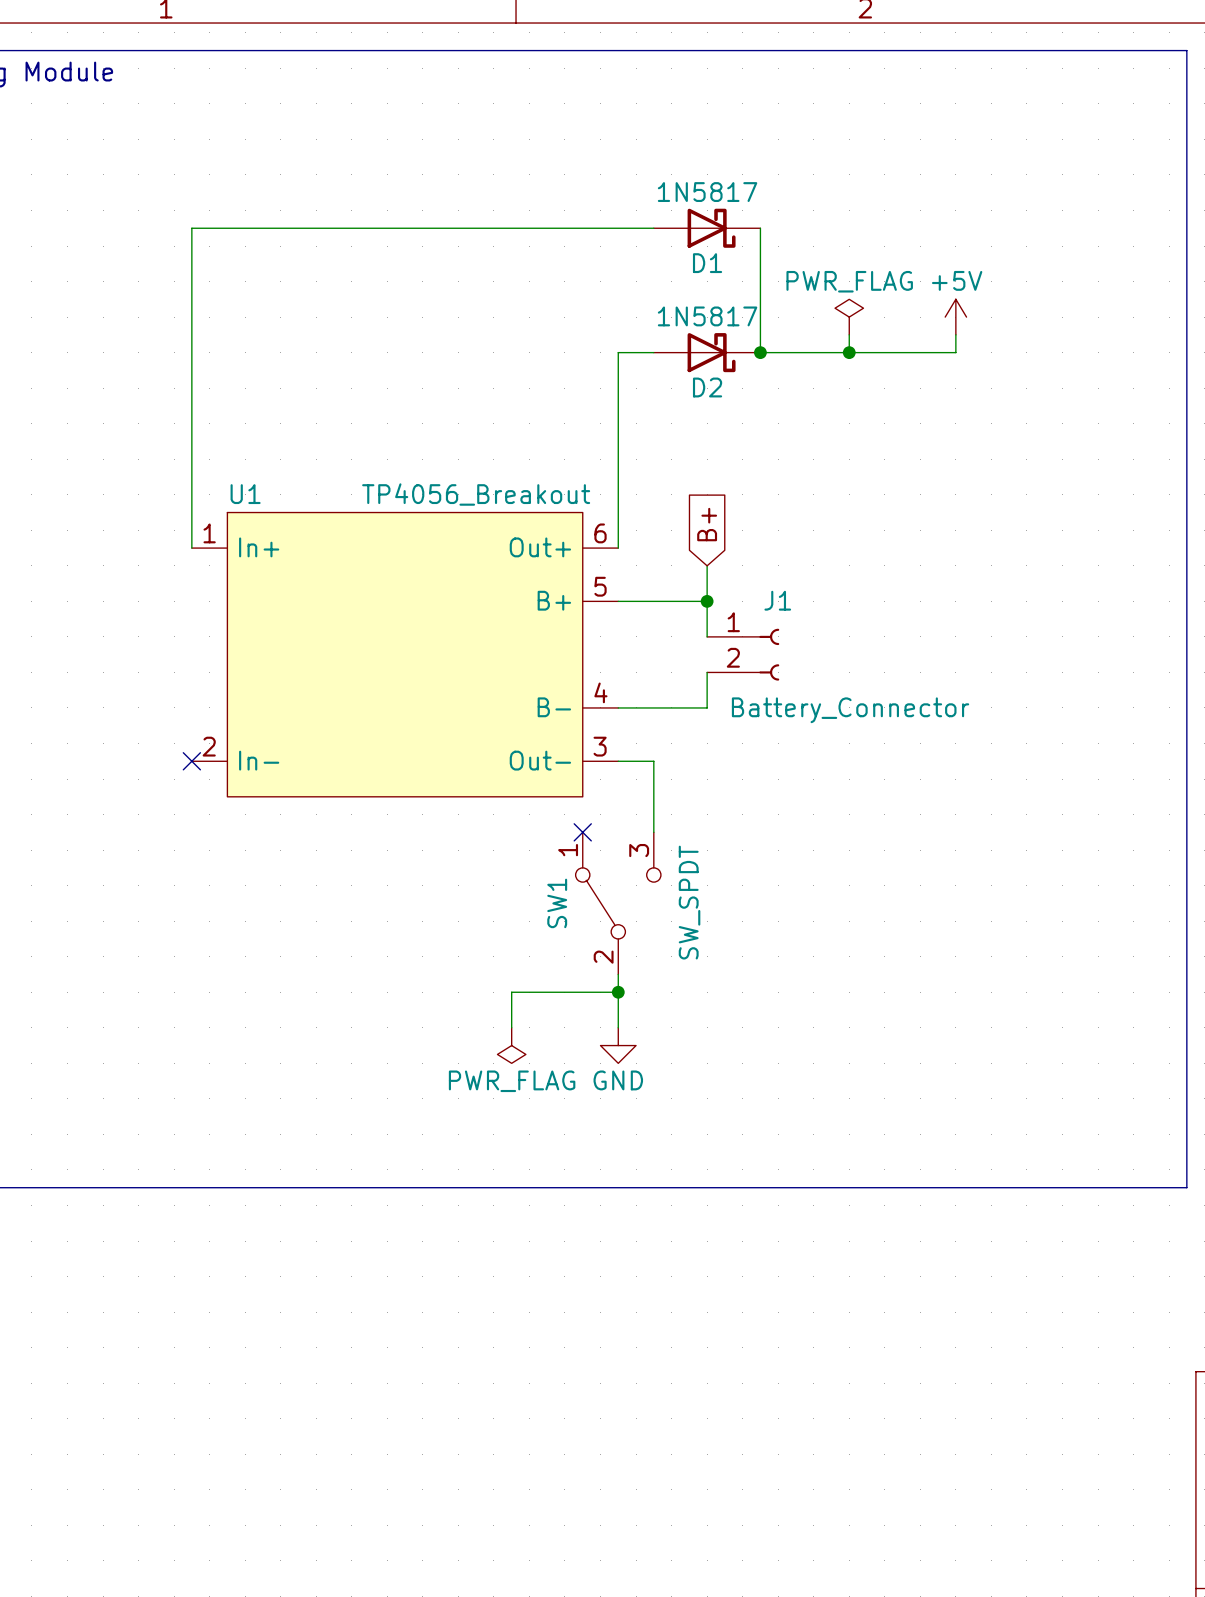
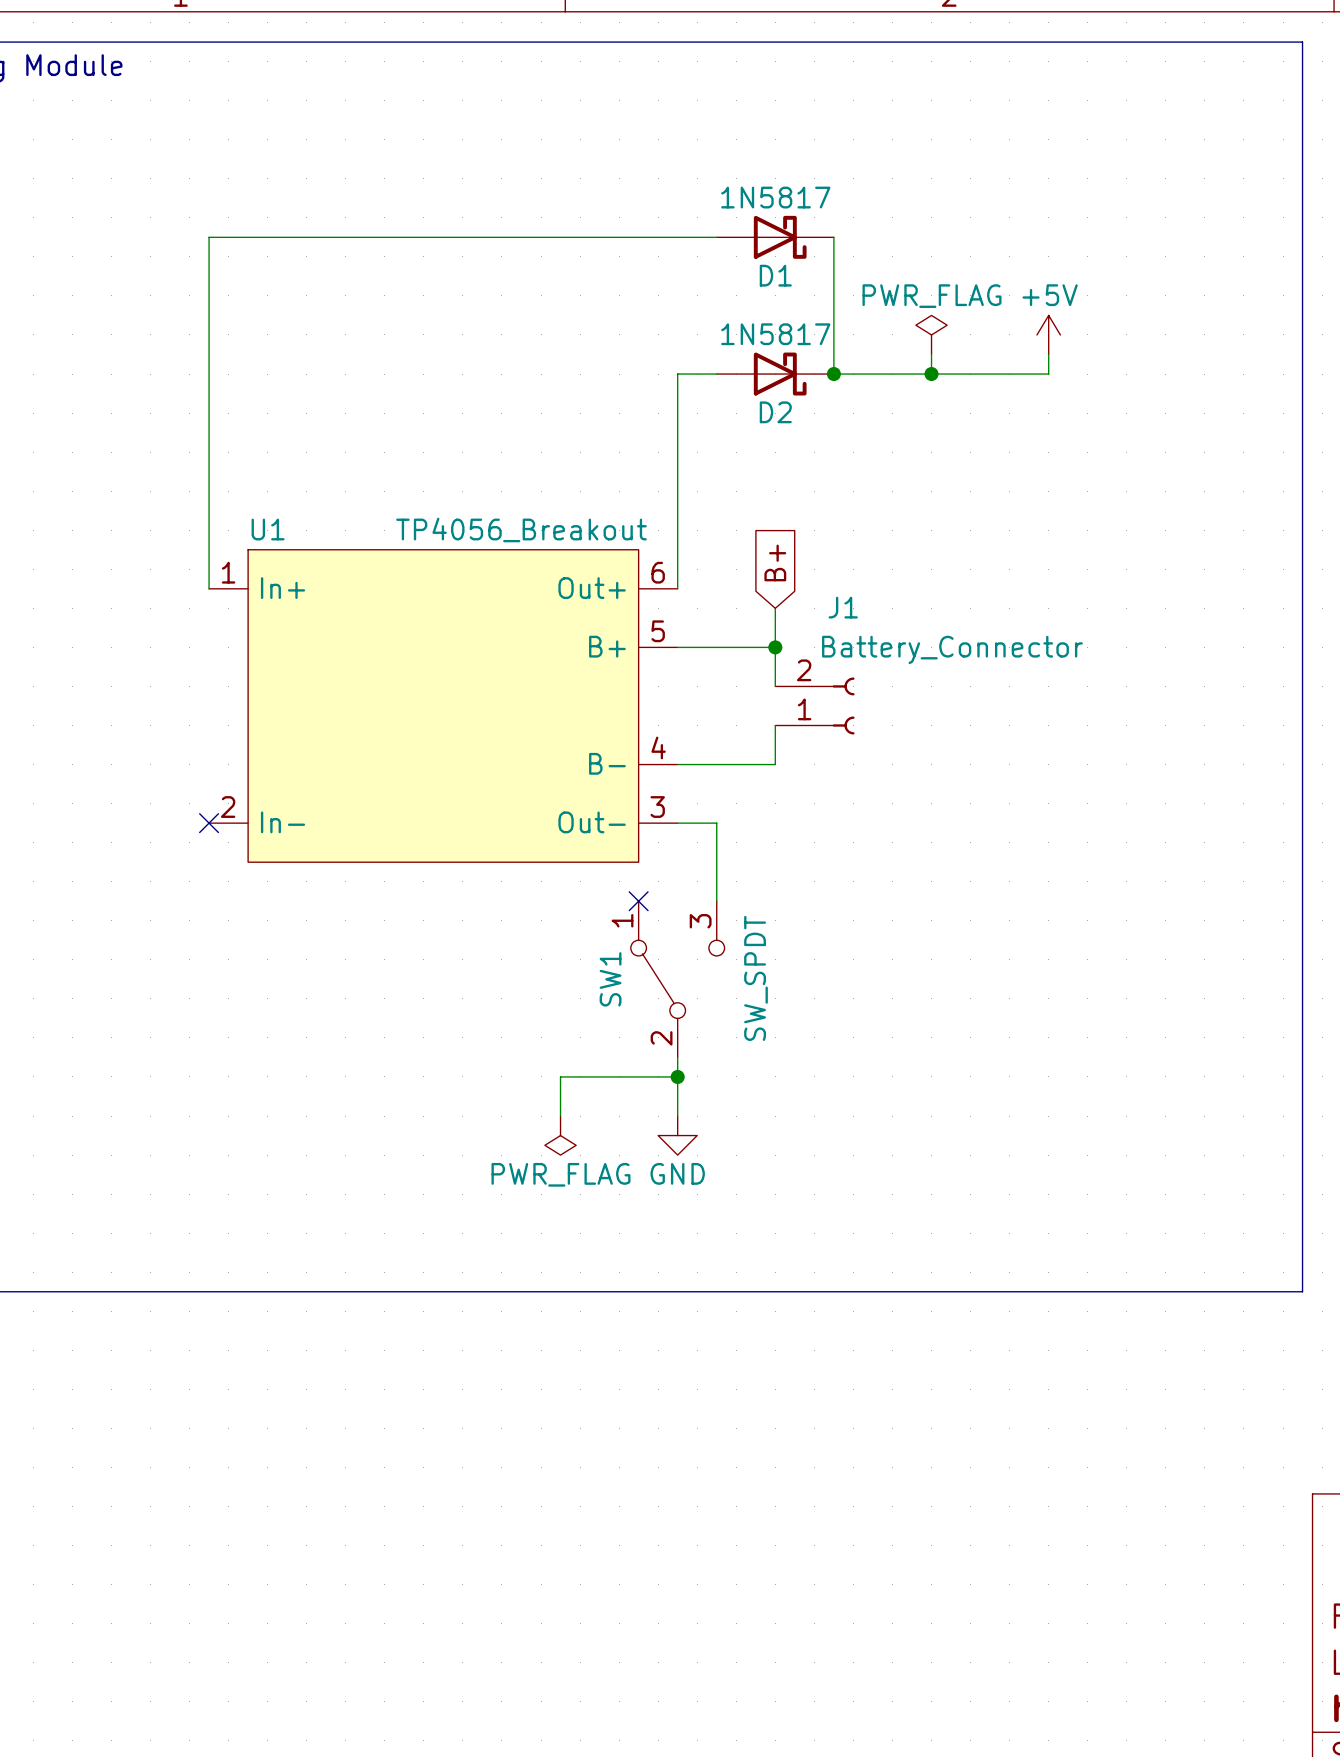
J1 name position: J1 (777, 600) -> J1 (843, 607)
J1 flip: as is (769, 654) -> up-down (843, 705)

